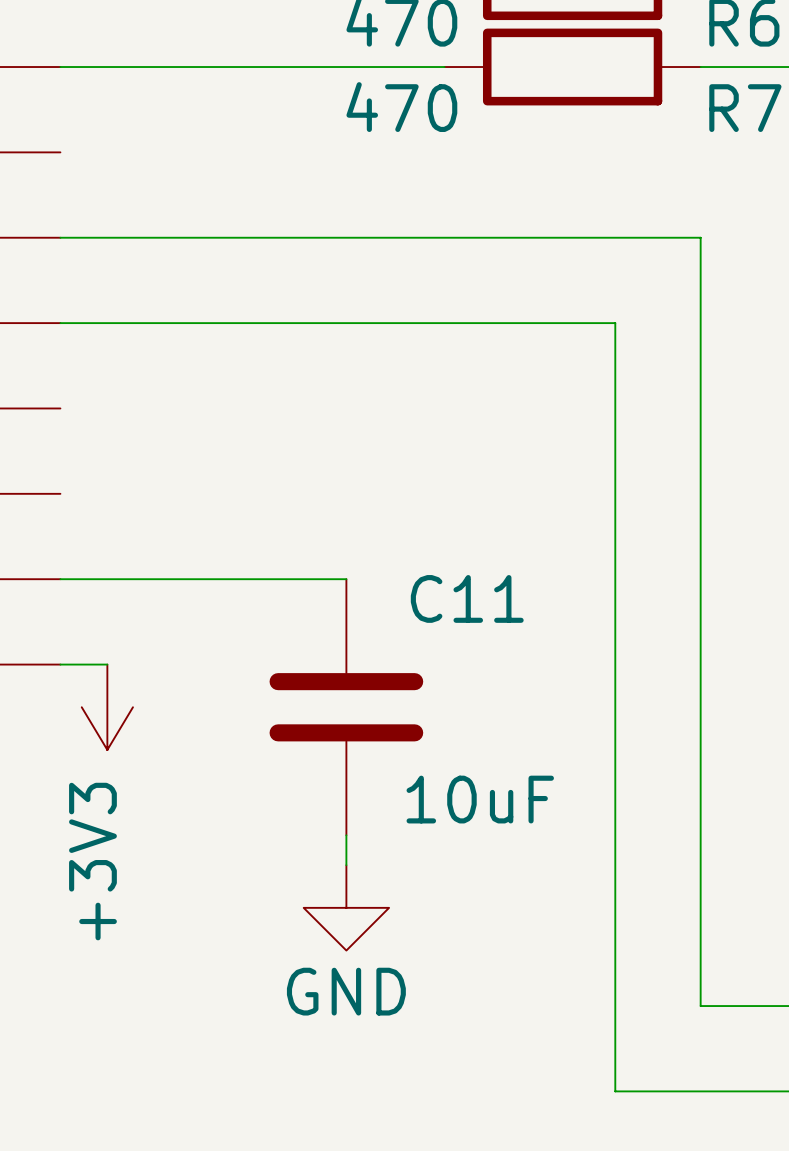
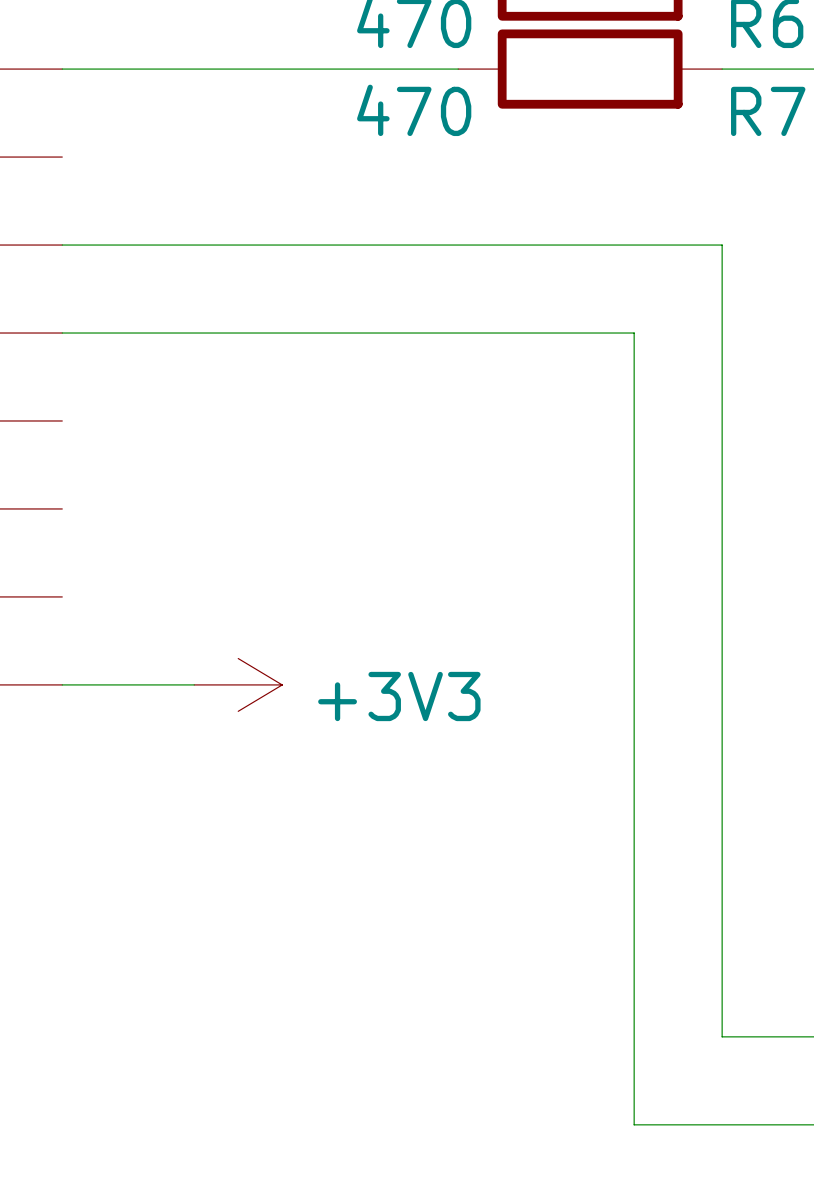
wire: (60, 579) (346, 579) -> none
wire: none -> (110, 684) (194, 684)
power symbol rotation: 0° (107, 707) -> 90° counterclockwise (238, 684)
power symbol position: +3V3 (107, 707) -> +3V3 (238, 684)
C11: 10uF (346, 707) -> none
wire: (346, 835) (346, 865) -> none
power symbol: GND (346, 907) -> none

